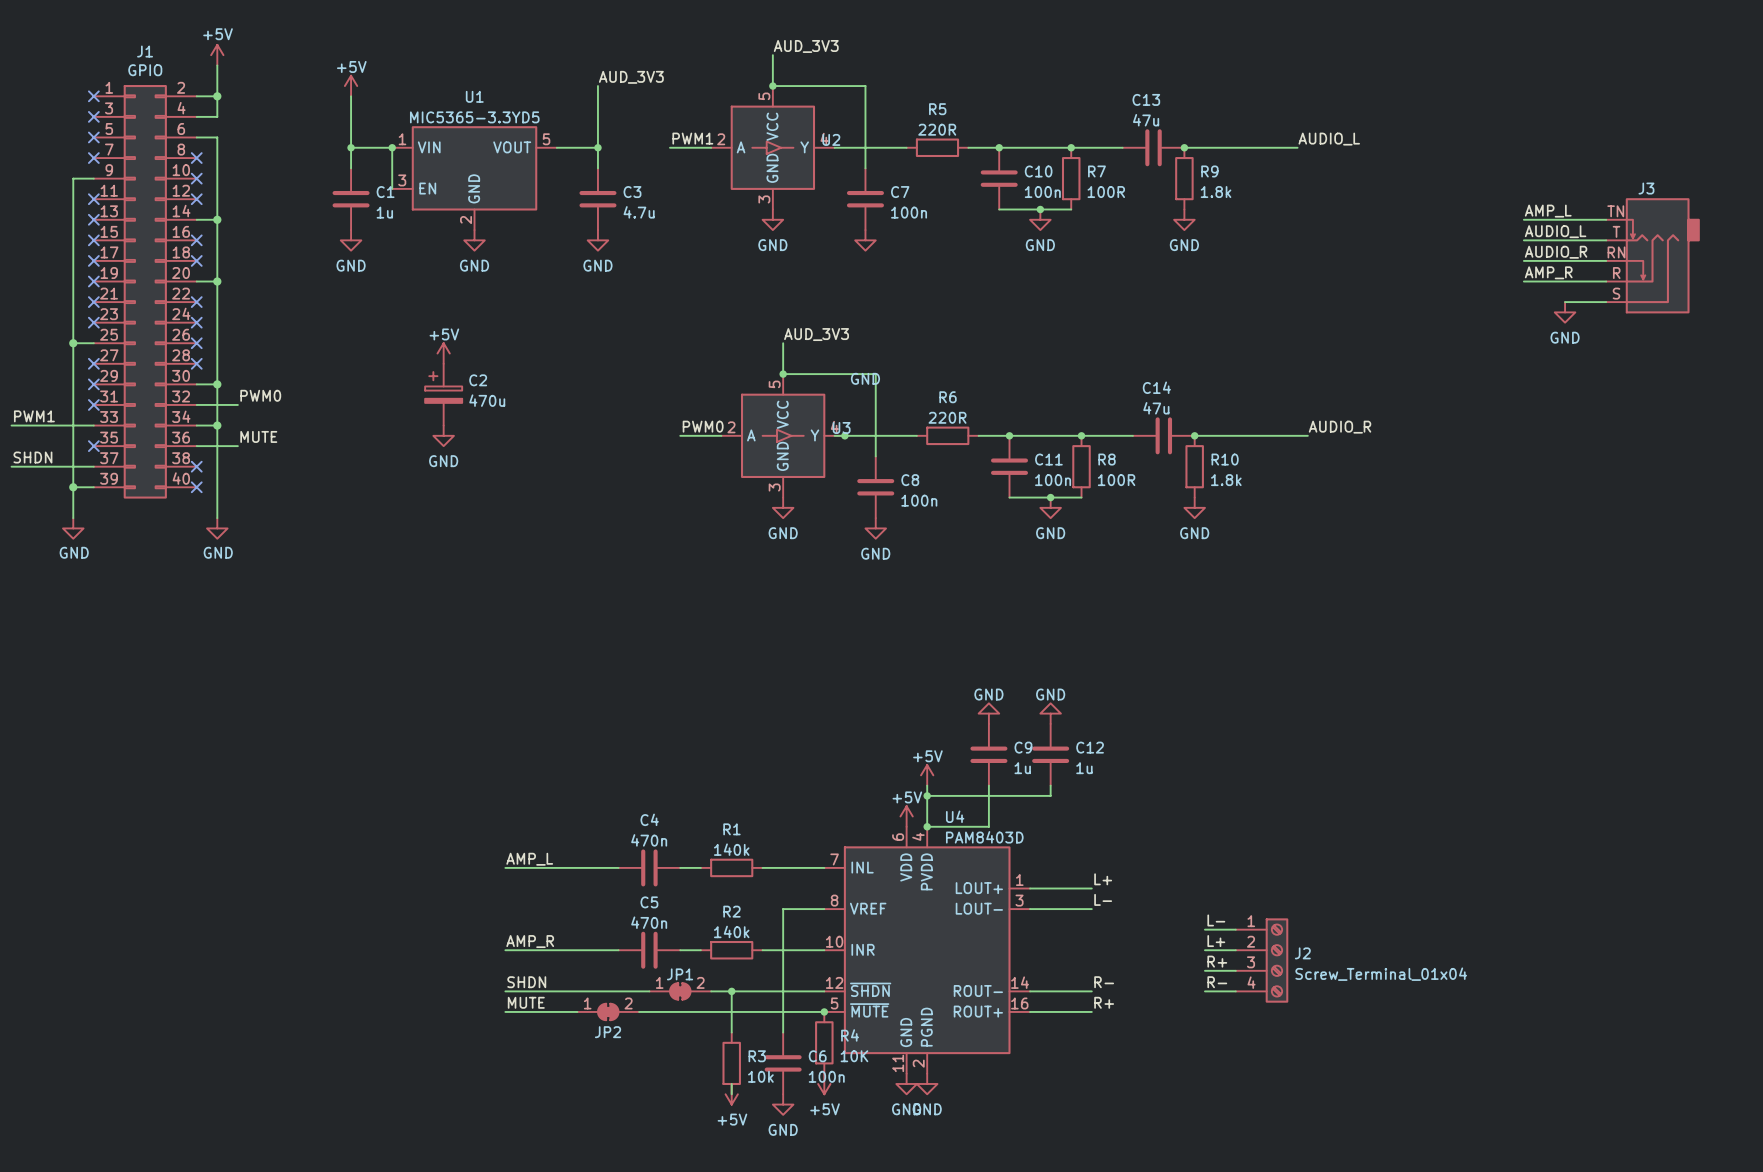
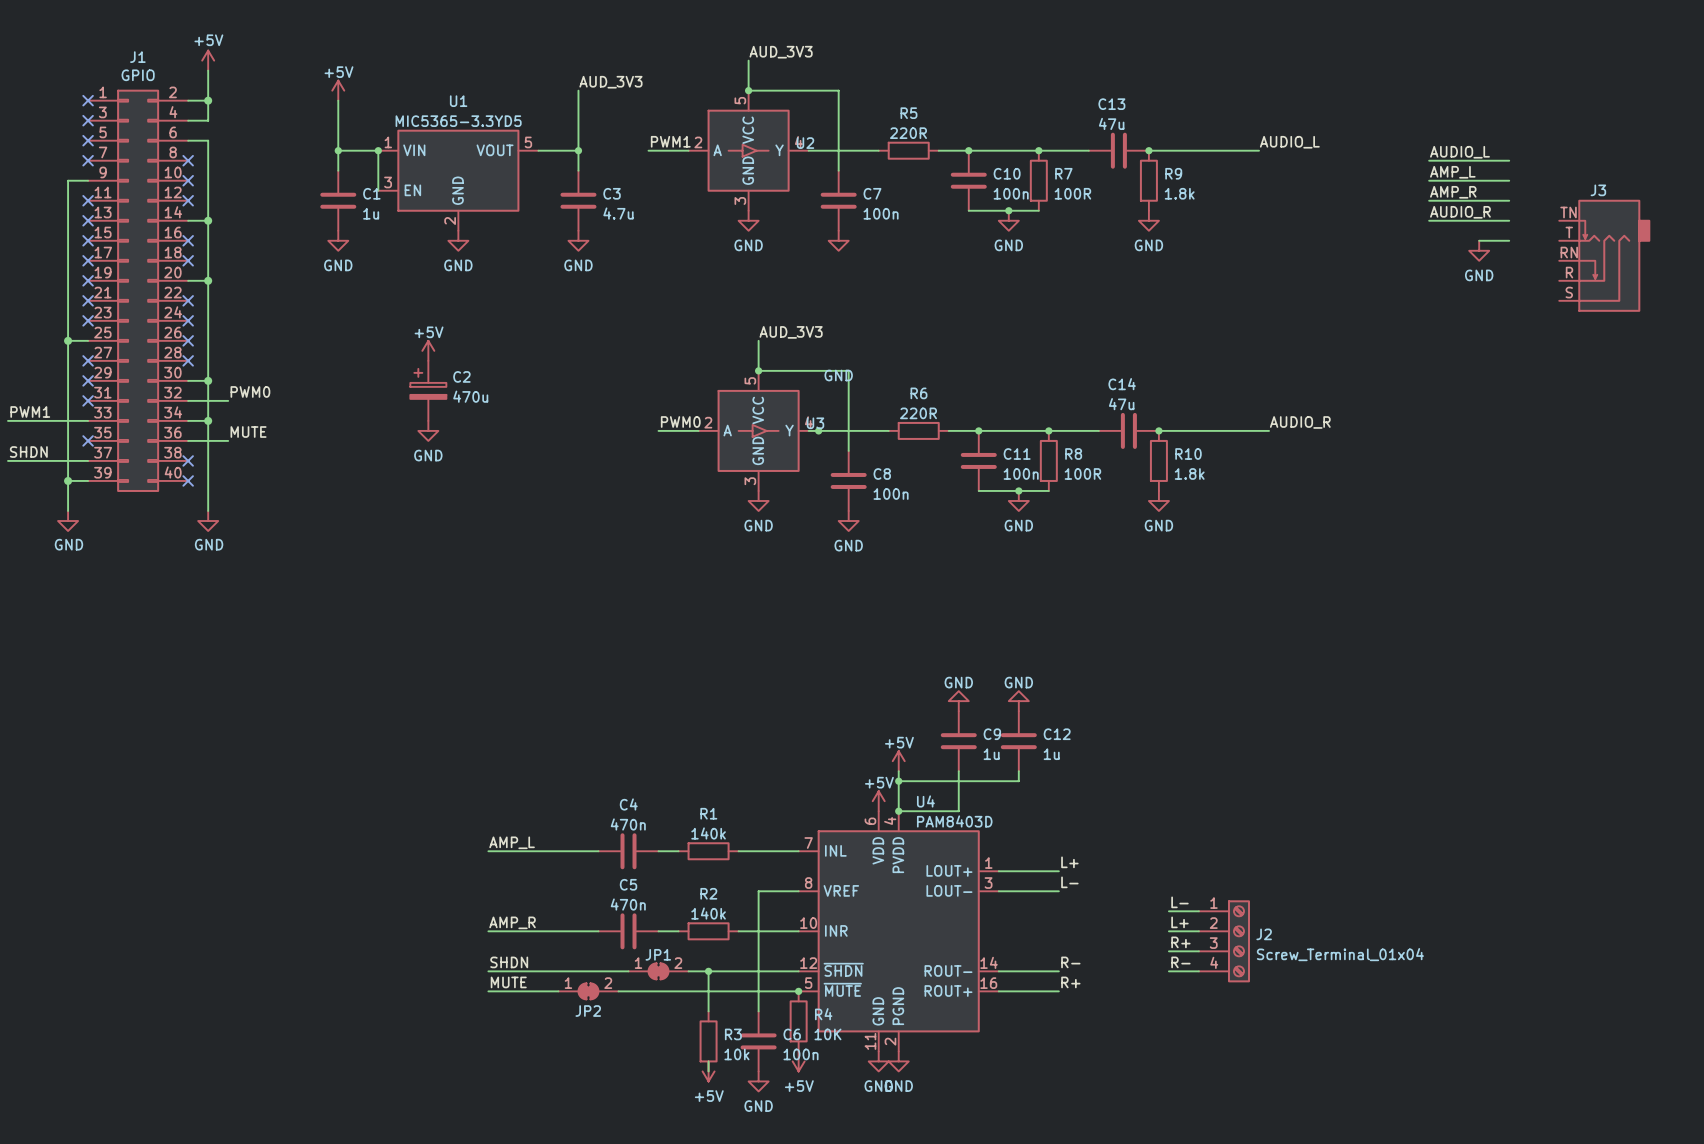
wire: none -> (1429, 160) (1509, 160)
label position: AMP_L (1548, 211) -> AMP_L (1452, 172)
wire: (1554, 219) (1606, 219) -> (1429, 220) (1479, 220)
label position: AUDIO_L (1555, 231) -> AUDIO_L (1459, 152)
wire: (1554, 240) (1606, 240) -> none
label position: AUDIO_R (1556, 252) -> AUDIO_R (1460, 212)
wire: (1523, 260) (1606, 260) -> (1429, 180) (1509, 180)
label position: AMP_R (1548, 272) -> AMP_R (1453, 192)
wire: (1523, 281) (1606, 281) -> (1429, 200) (1509, 200)
wire: (1565, 302) (1606, 302) -> none
power symbol position: GND (1565, 312) -> GND (1479, 250)

